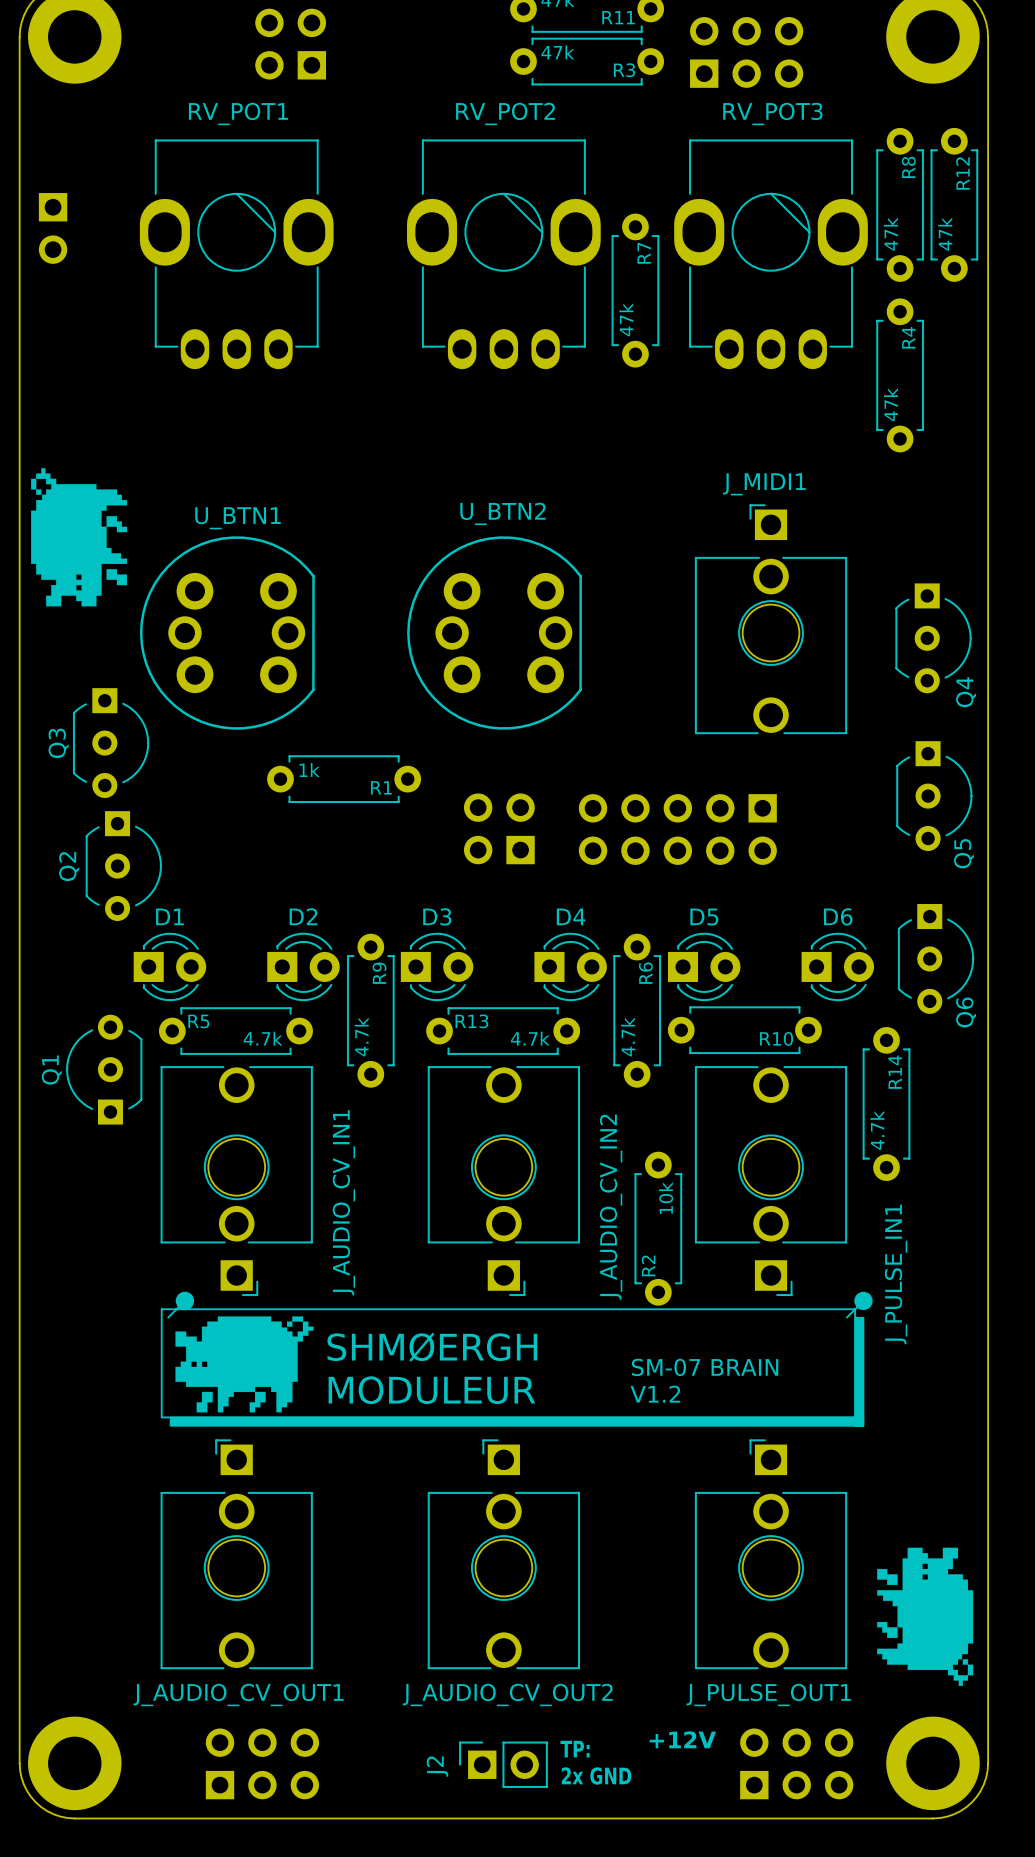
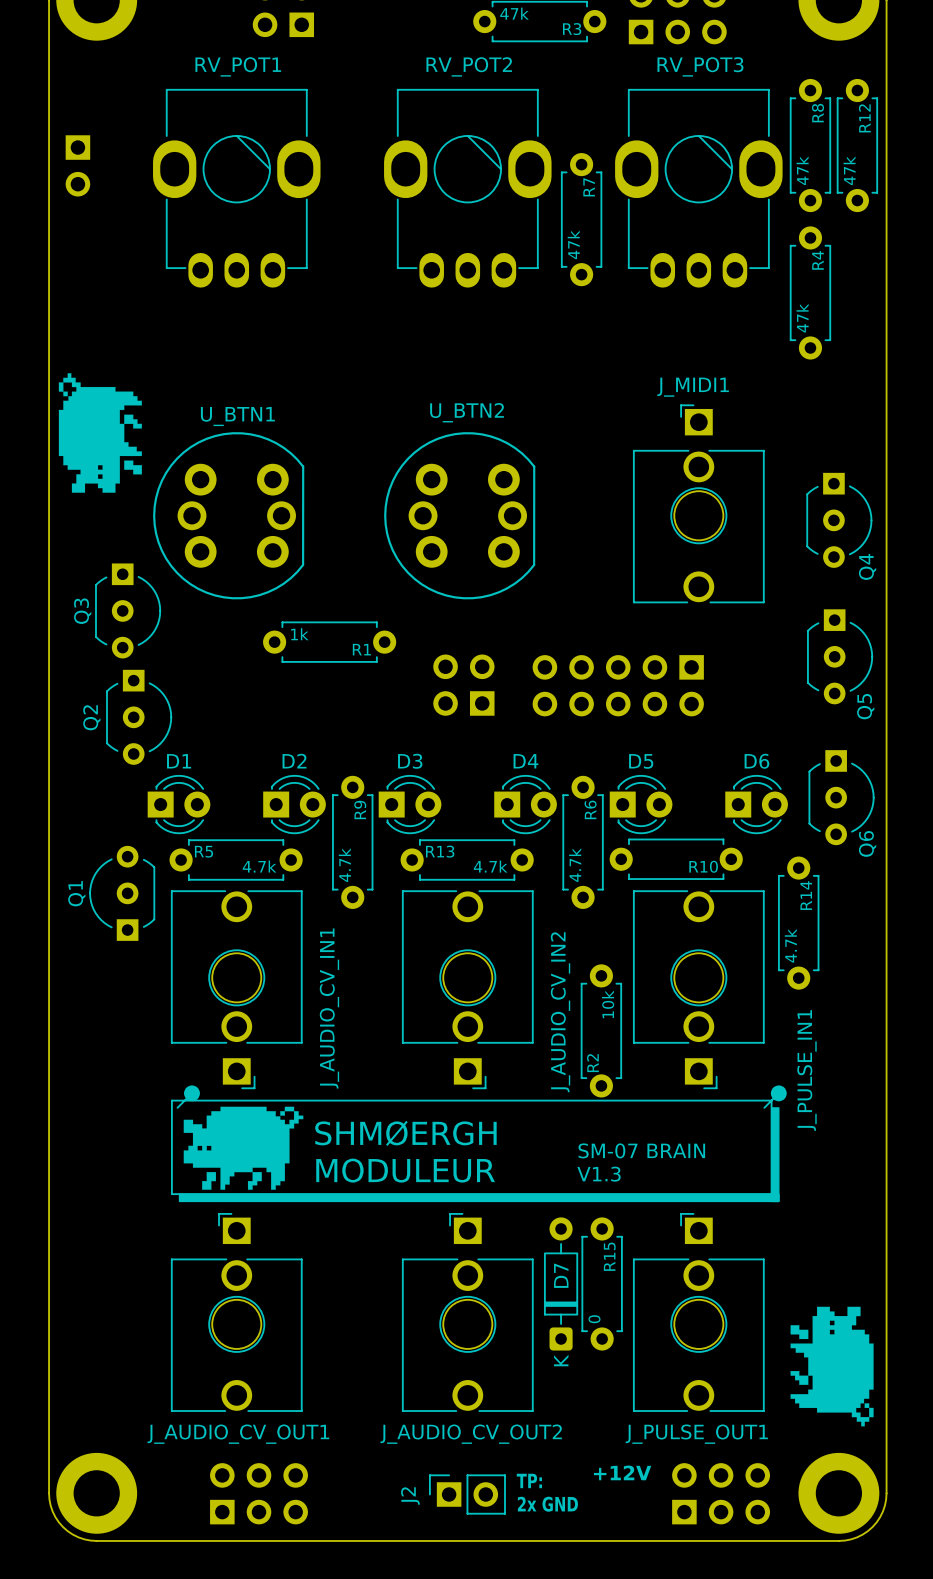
text: V1.2 (655, 1394) -> V1.3 (599, 1174)
D7: none -> (561, 1283)
R15: none -> 0 (602, 1283)

